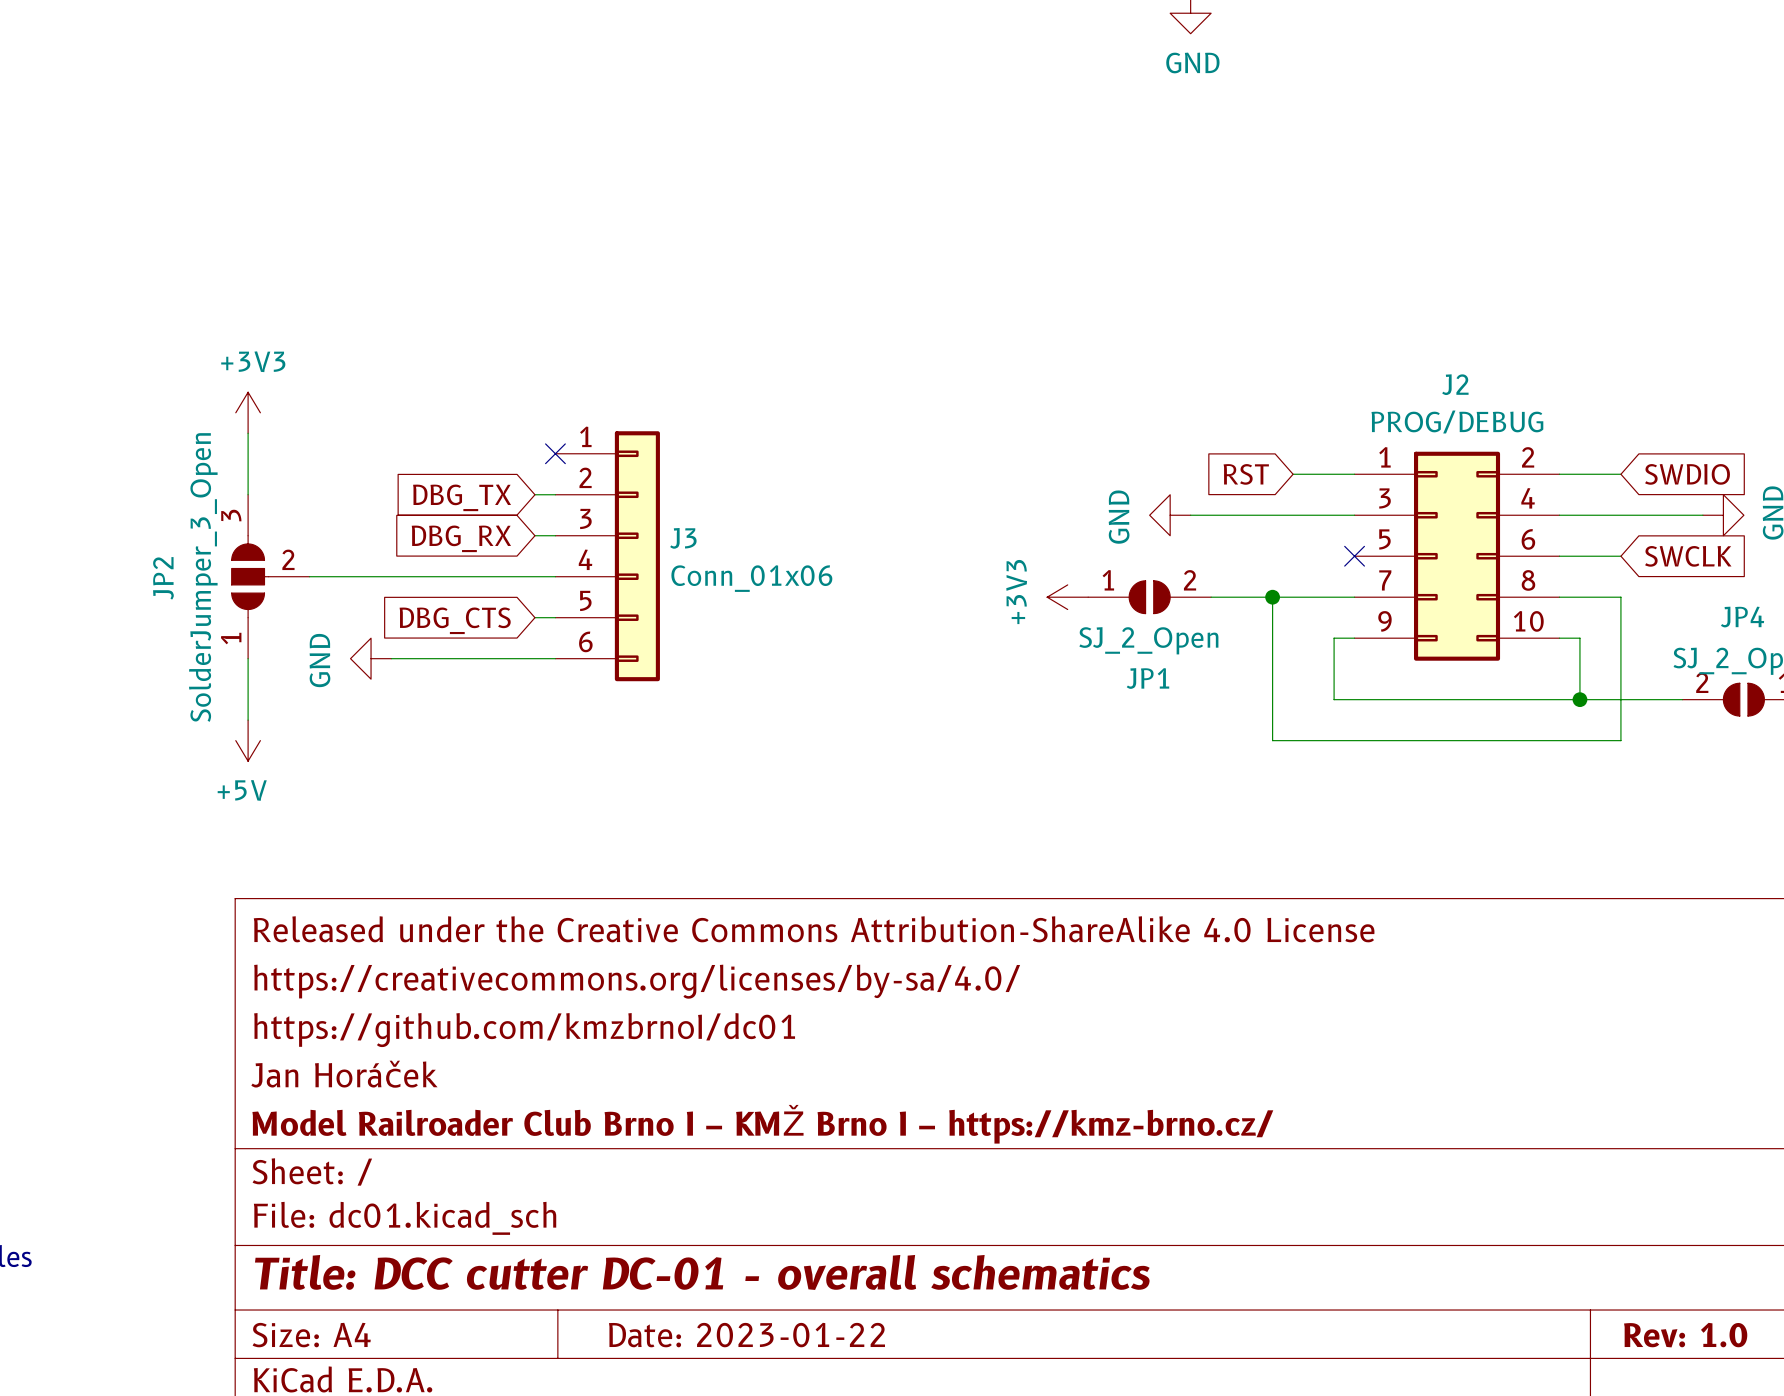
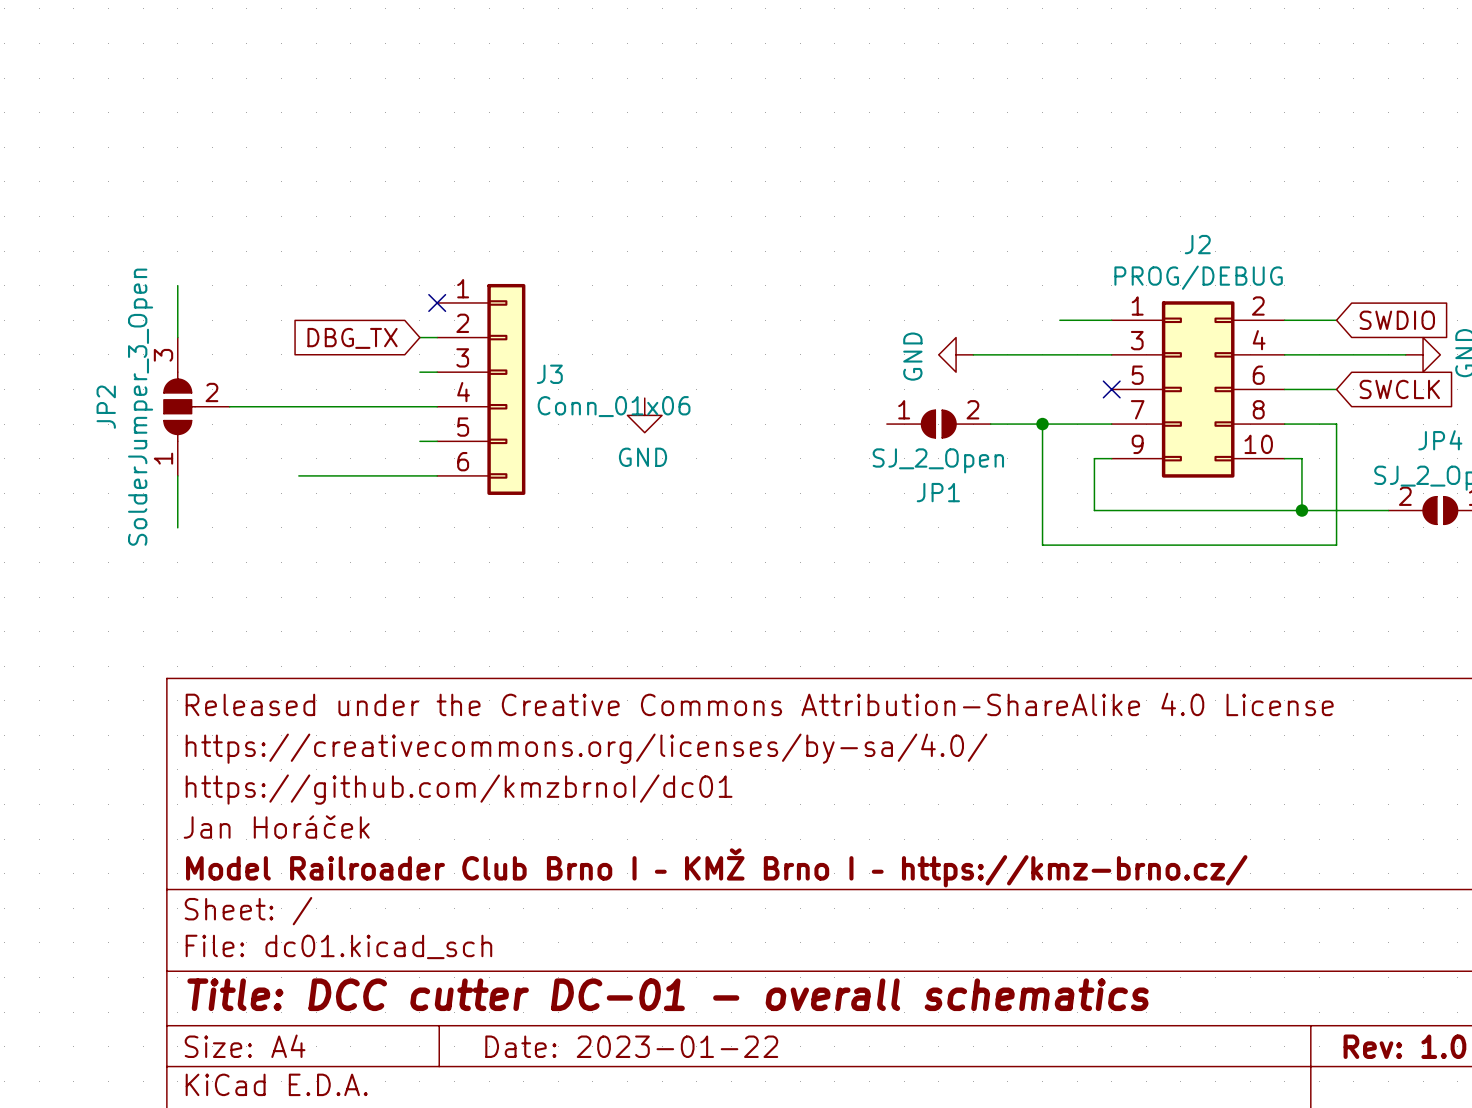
power symbol: +3V3 (248, 412) -> none
global label: RST (1246, 474) -> none
global label: DBG_RX (461, 538) -> none
power symbol: none -> GND (644, 415)
power symbol: +3V3 (1067, 597) -> none
global label: DBG_CTS (455, 620) -> none
power symbol: GND (371, 658) -> none
power symbol: +5V (248, 740) -> none

